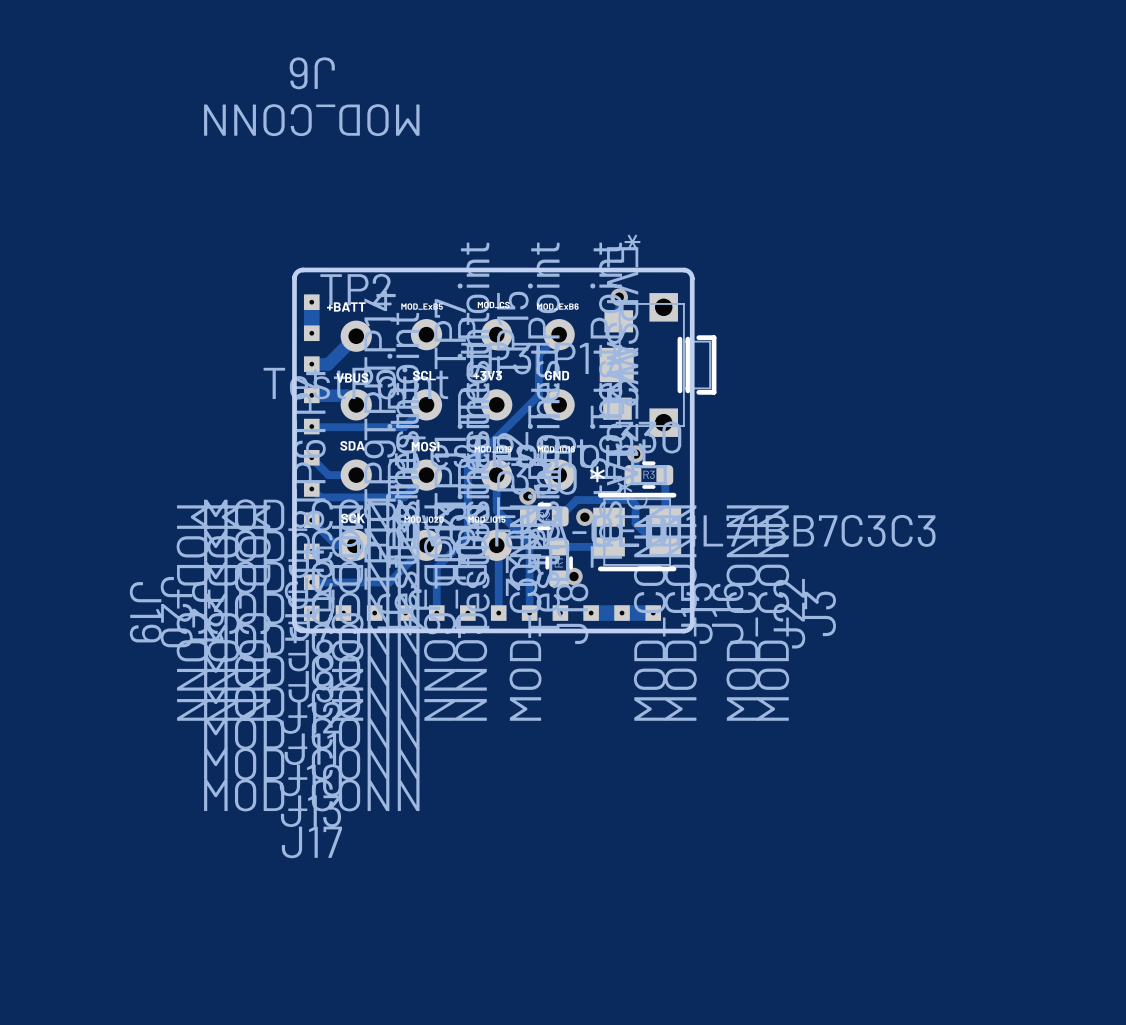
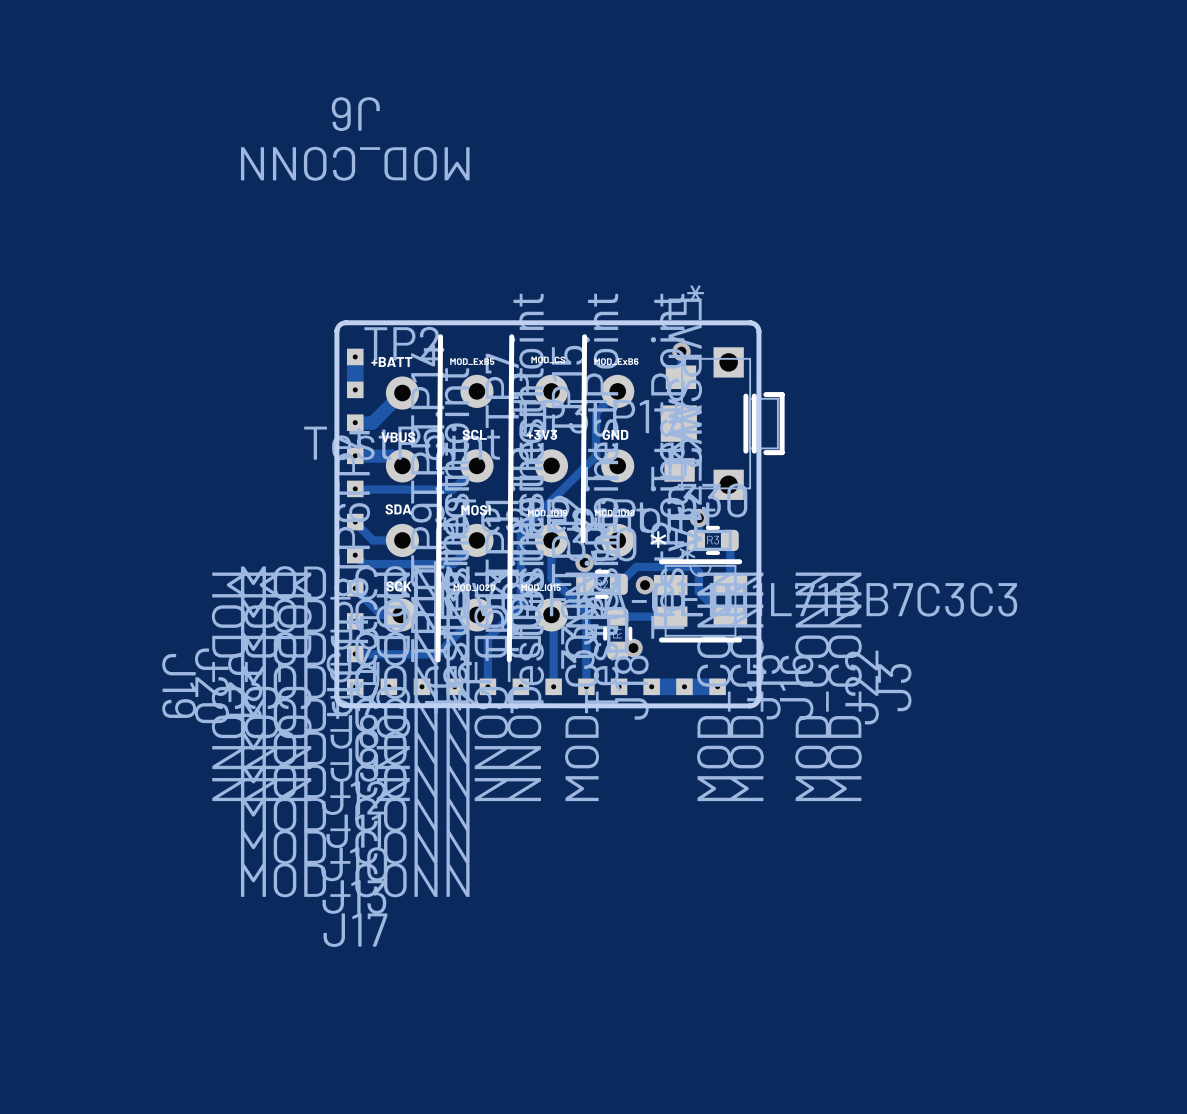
line: none -> (440, 336) (438, 659)
line: none -> (511, 336) (509, 659)
line: none -> (584, 336) (583, 540)

